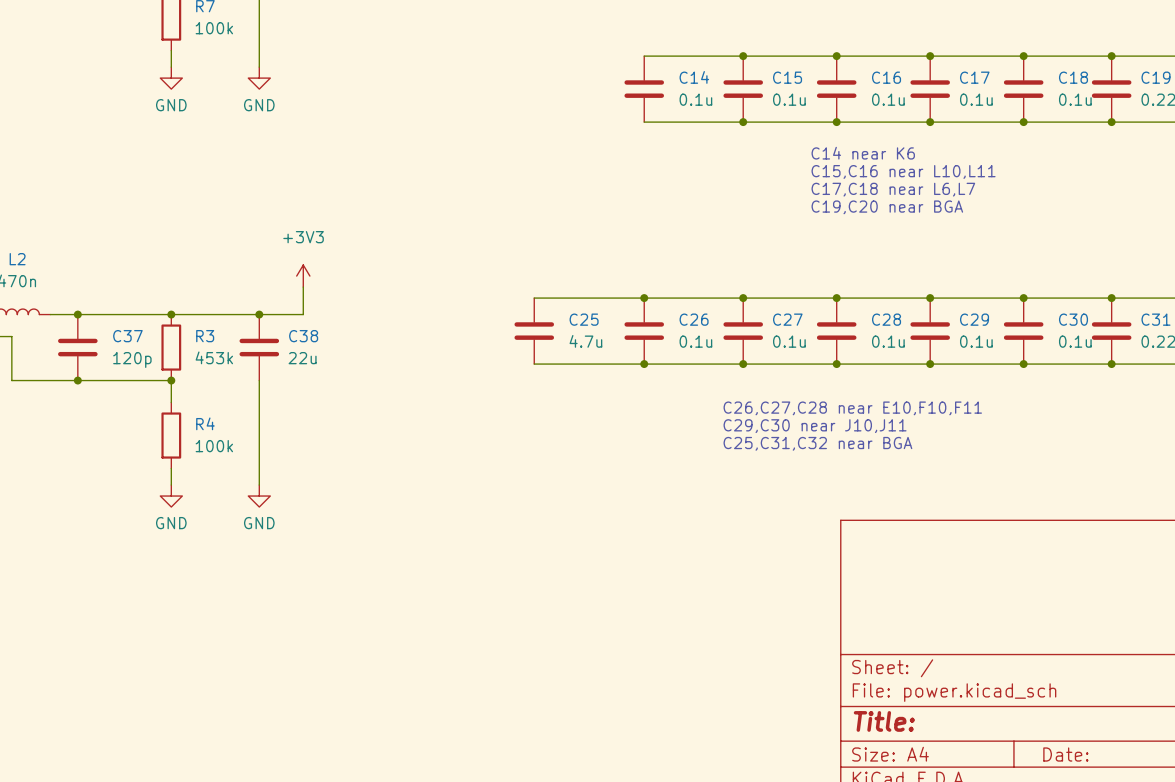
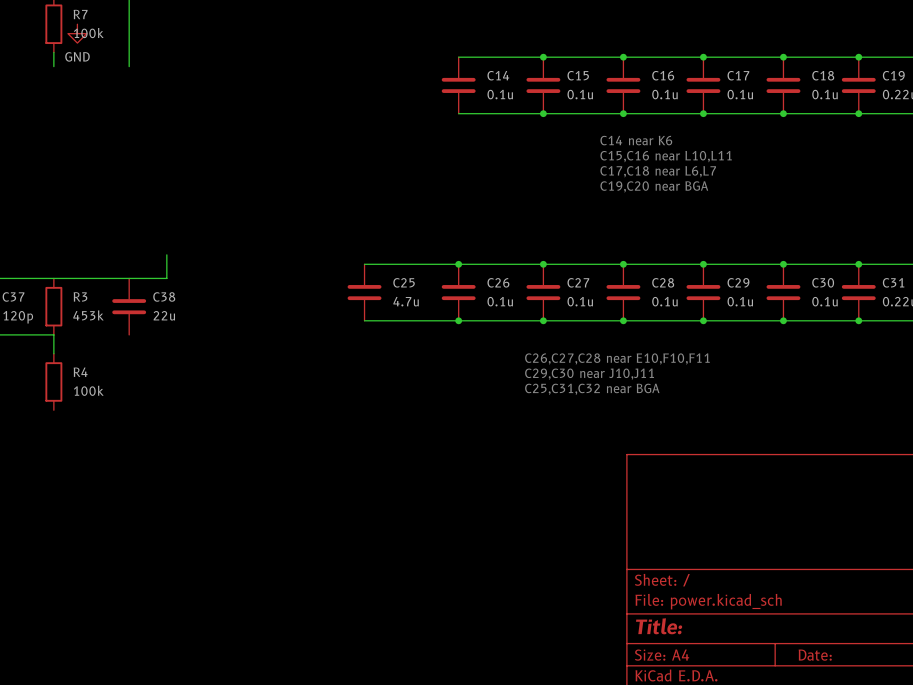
power symbol: none -> GND (77, 33)
power symbol: GND (171, 78) -> none
power symbol: GND (259, 78) -> none
power symbol: +3V3 (303, 276) -> none
junction: (171, 314) -> none
junction: (259, 314) -> none
junction: (171, 380) -> none
wire: (259, 380) (259, 485) -> none
wire: (171, 468) (171, 485) -> none
power symbol: GND (171, 496) -> none
power symbol: GND (259, 496) -> none

